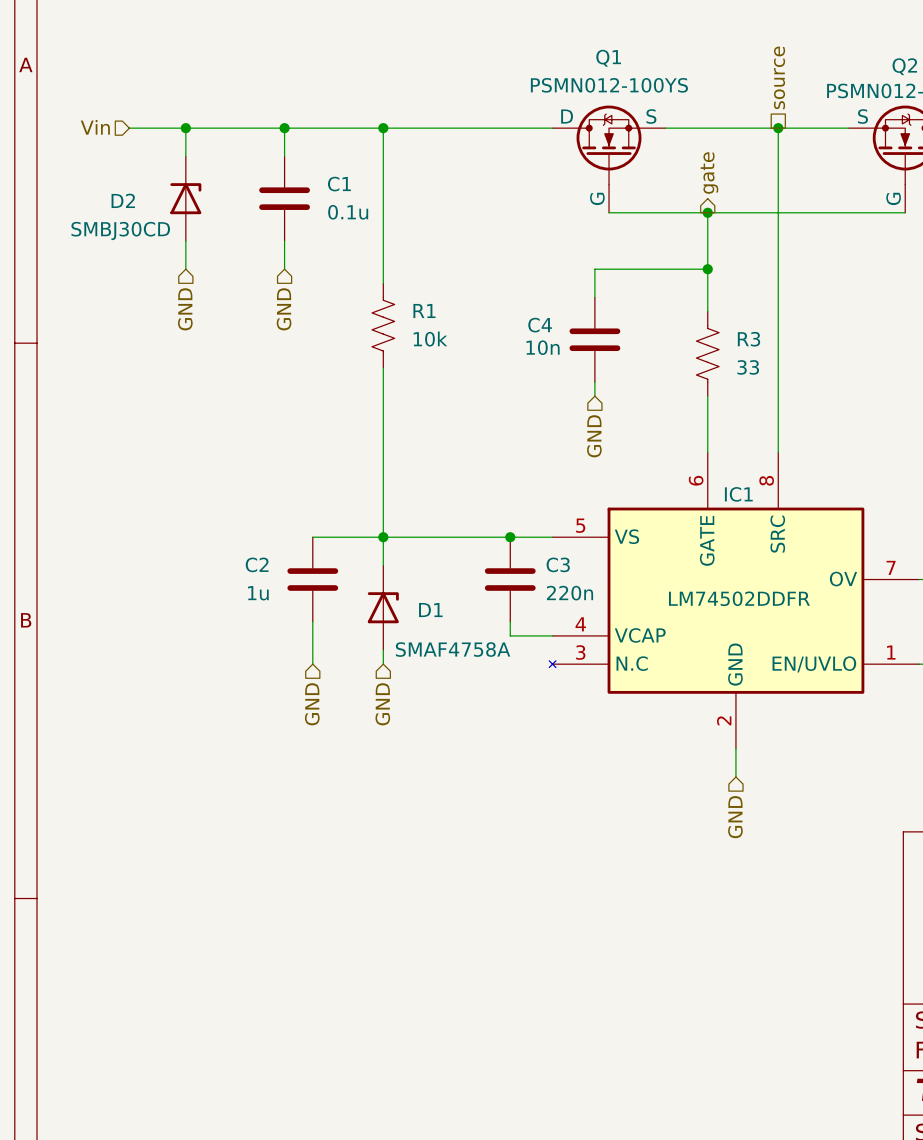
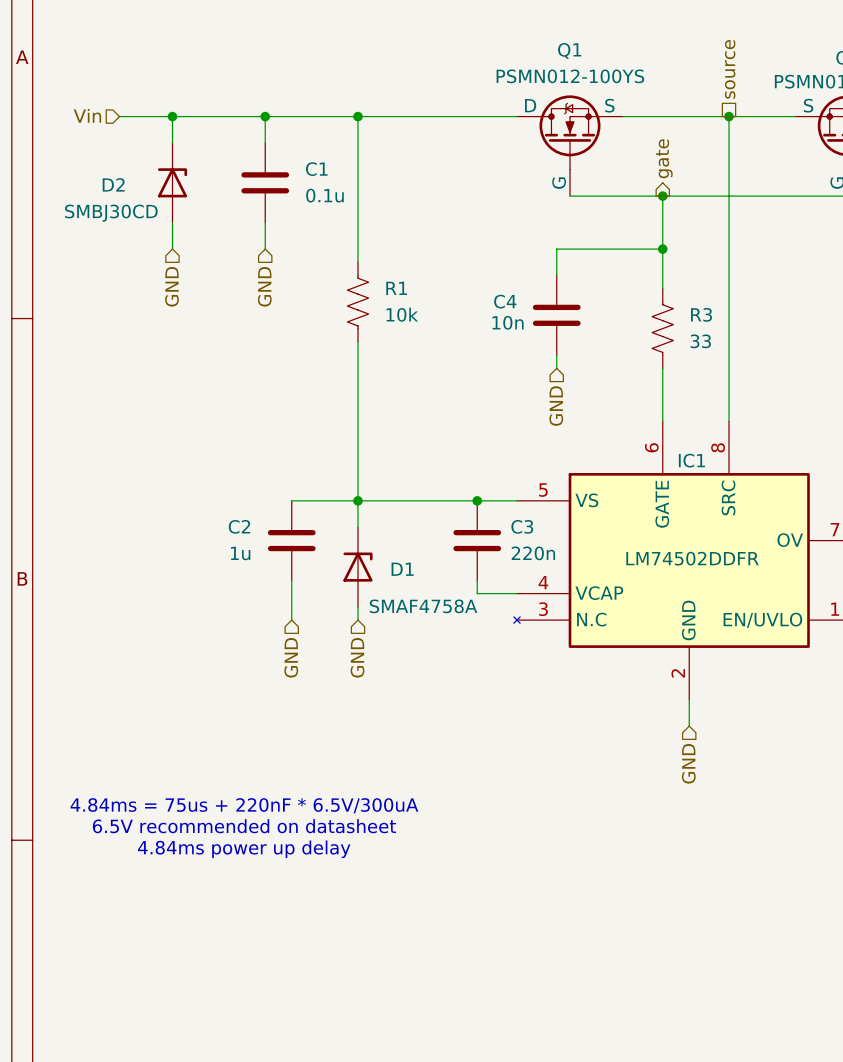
text: none -> 4.84ms = 75us + 220nF * 6.5V/300uA (244, 805)
text: none -> 6.5V recommended on datasheet (244, 826)
text: none -> 4.84ms power up delay (244, 849)

